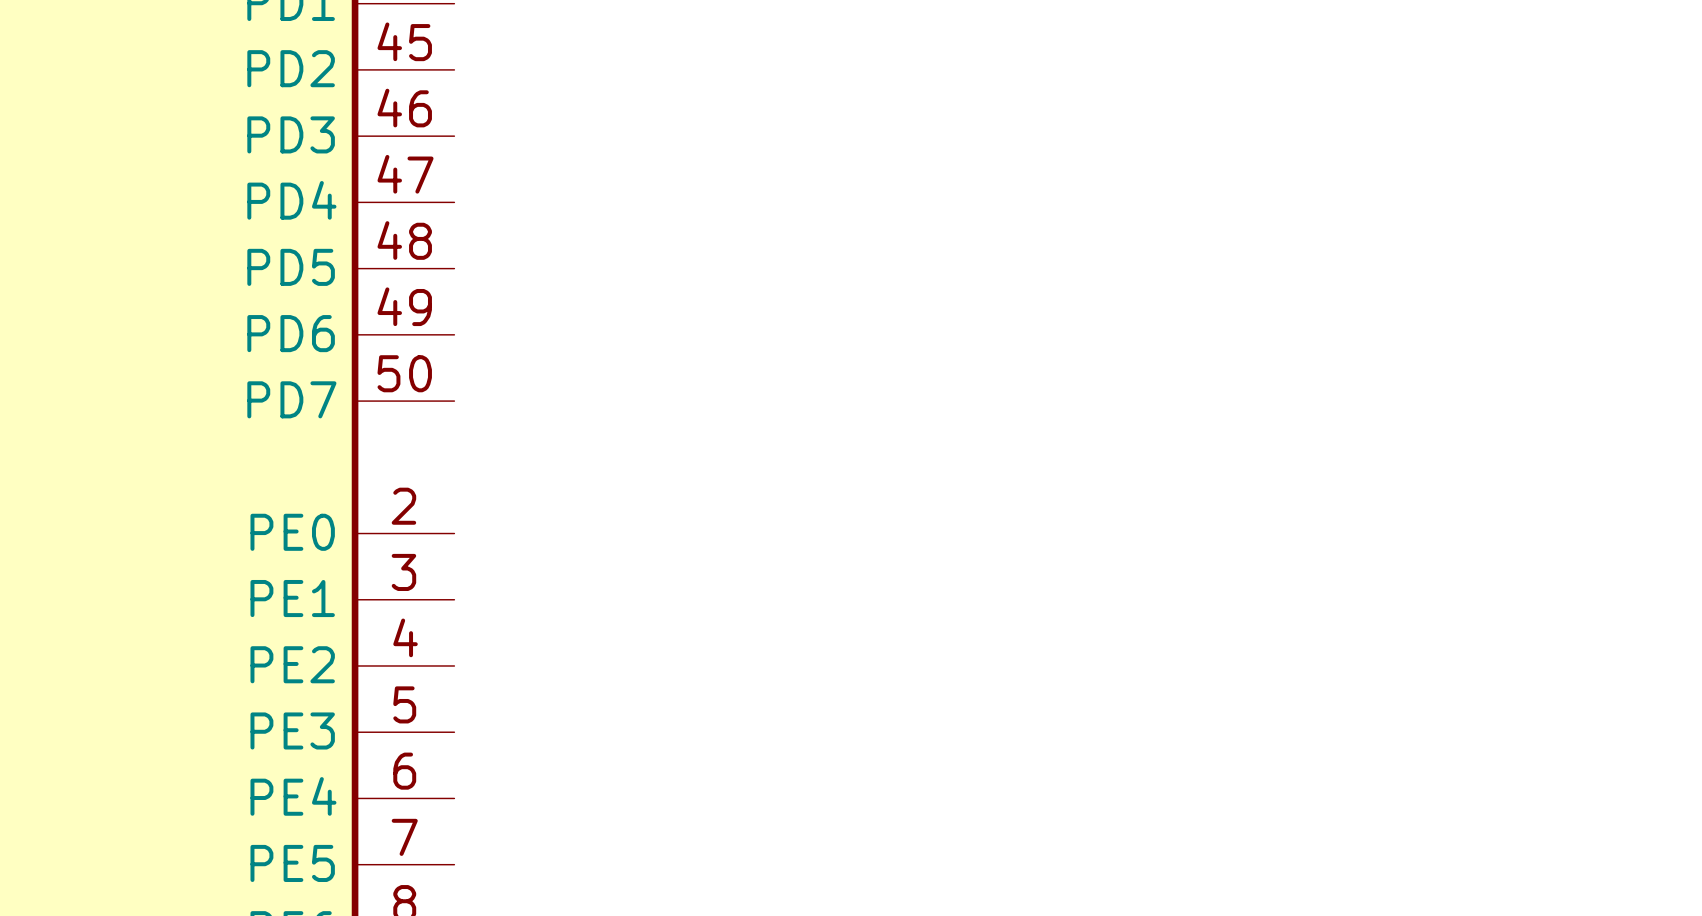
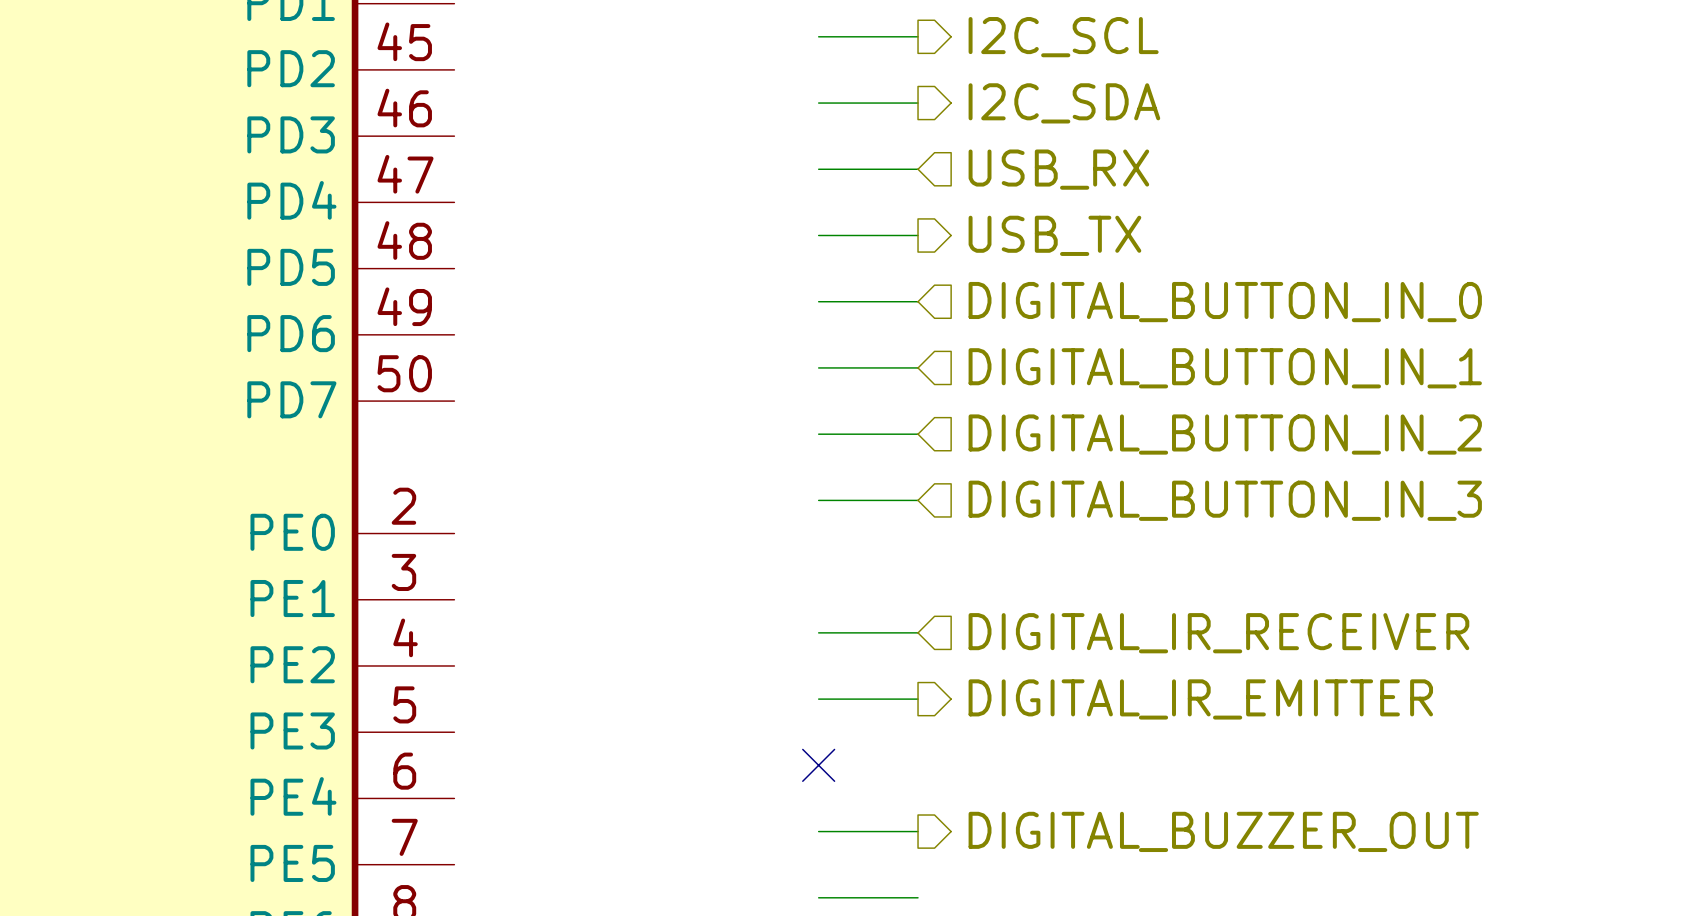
wire: none -> (818, 36) (918, 36)
hierarchical label: none -> I2C_SCL (1063, 37)
wire: none -> (818, 103) (918, 103)
hierarchical label: none -> I2C_SDA (1064, 103)
wire: none -> (818, 169) (918, 169)
hierarchical label: none -> USB_RX (1058, 169)
wire: none -> (818, 235) (918, 235)
hierarchical label: none -> USB_TX (1054, 235)
wire: none -> (818, 301) (918, 301)
hierarchical label: none -> DIGITAL_BUTTON_IN_0 (1225, 302)
wire: none -> (818, 367) (918, 367)
hierarchical label: none -> DIGITAL_BUTTON_IN_1 (1225, 368)
wire: none -> (818, 434) (918, 434)
hierarchical label: none -> DIGITAL_BUTTON_IN_2 (1225, 434)
wire: none -> (818, 500) (918, 500)
hierarchical label: none -> DIGITAL_BUTTON_IN_3 (1225, 500)
wire: none -> (818, 632) (918, 632)
hierarchical label: none -> DIGITAL_IR_RECEIVER (1218, 633)
wire: none -> (818, 699) (918, 699)
hierarchical label: none -> DIGITAL_IR_EMITTER (1200, 699)
no-connect mark: none -> (818, 765)
wire: none -> (818, 831) (918, 831)
hierarchical label: none -> DIGITAL_BUZZER_OUT (1223, 831)
wire: none -> (818, 897) (918, 897)

